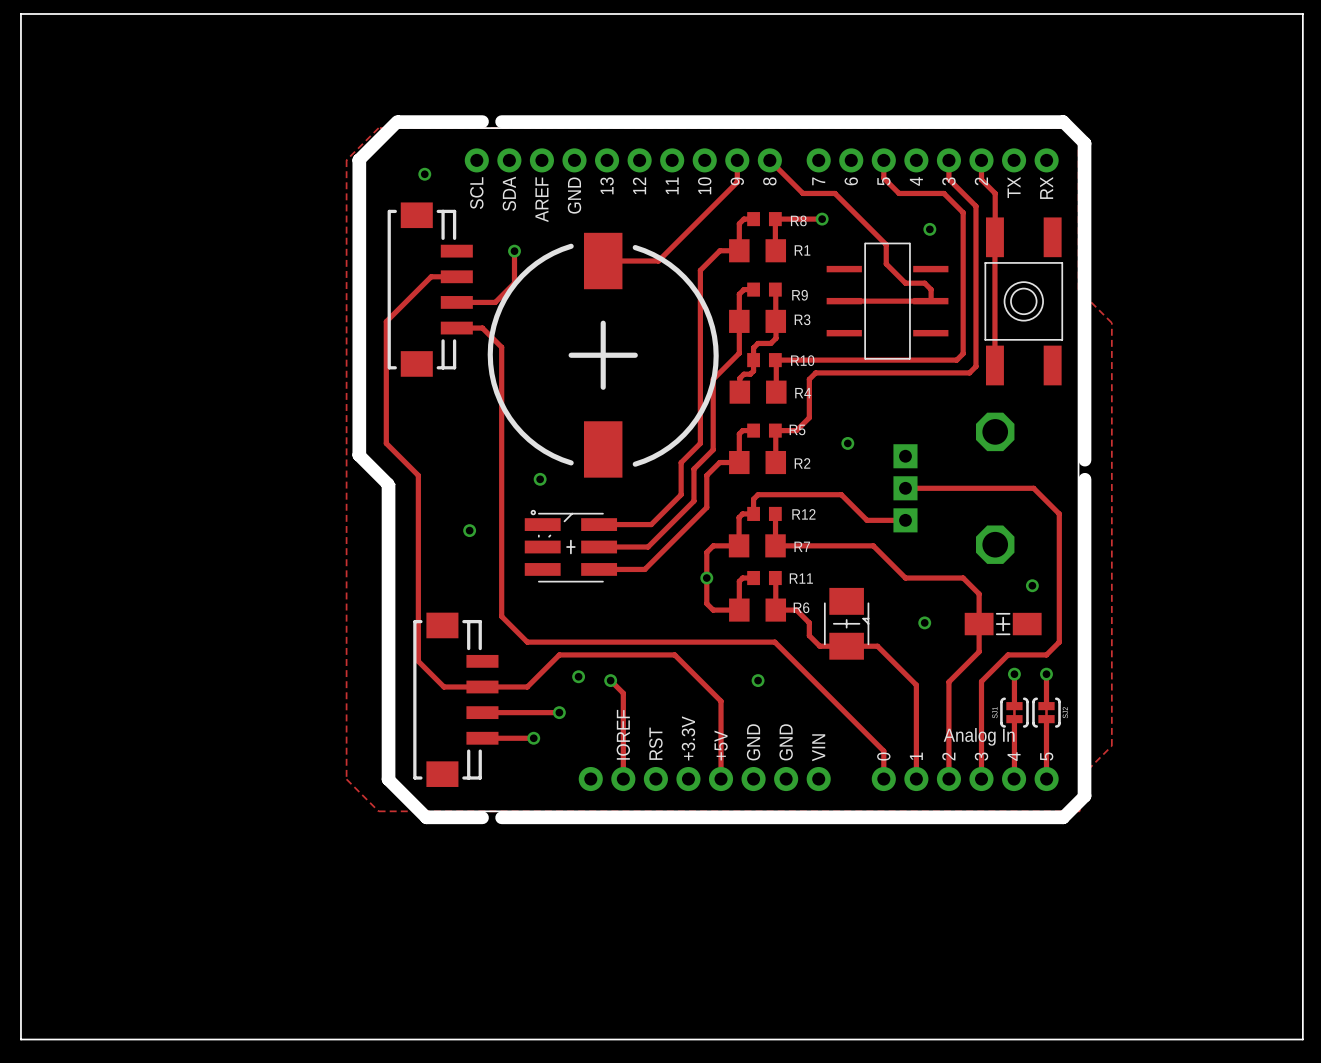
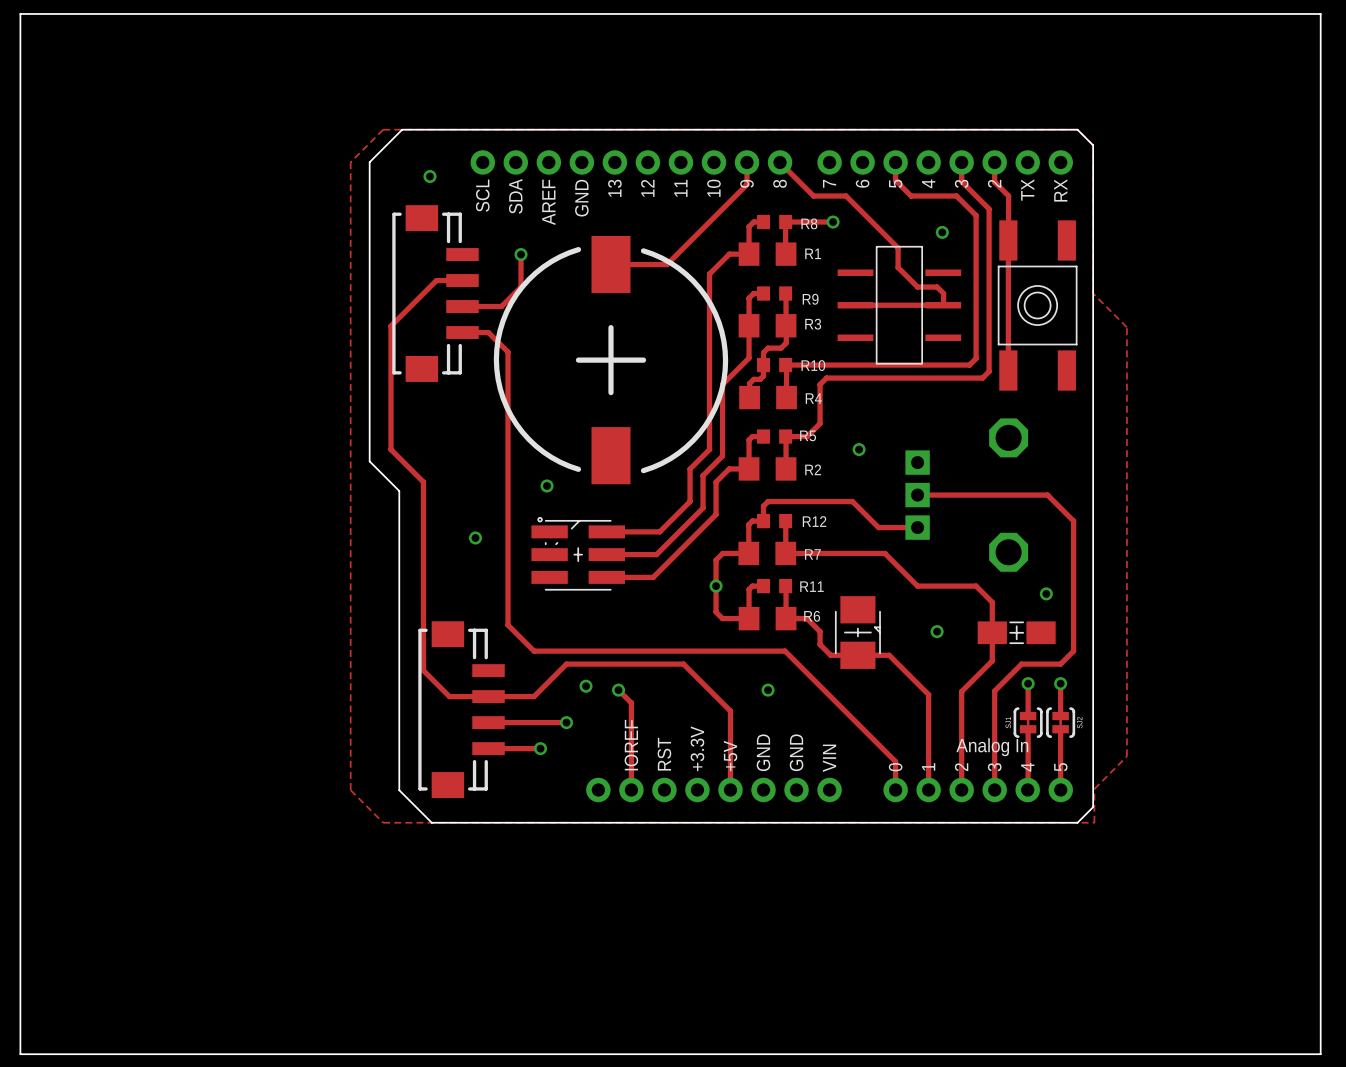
board edge: (397, 121) (358, 160) (358, 455) (388, 484) (388, 779) (426, 817) (482, 817) -> none
board edge: (399, 121) (482, 121) -> none
board edge: (501, 121) (1063, 121) (1084, 143) (1084, 460) -> none
board edge: (1084, 479) (1084, 795) (1063, 817) (501, 817) -> none

